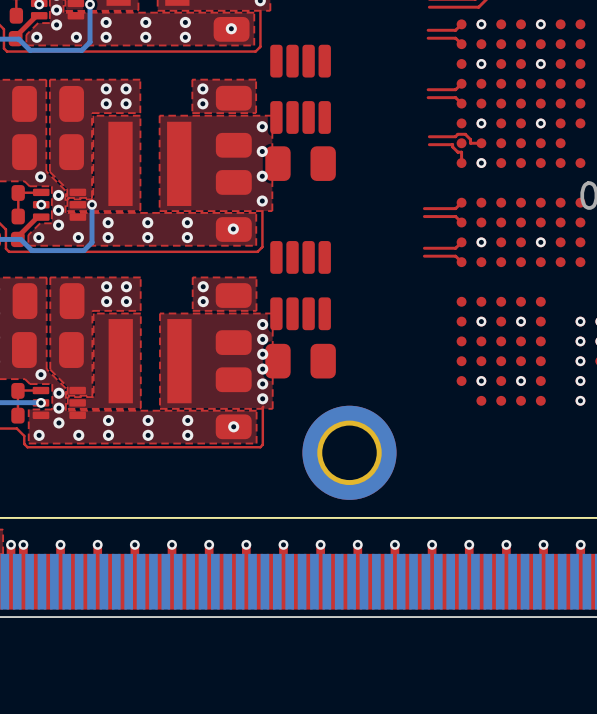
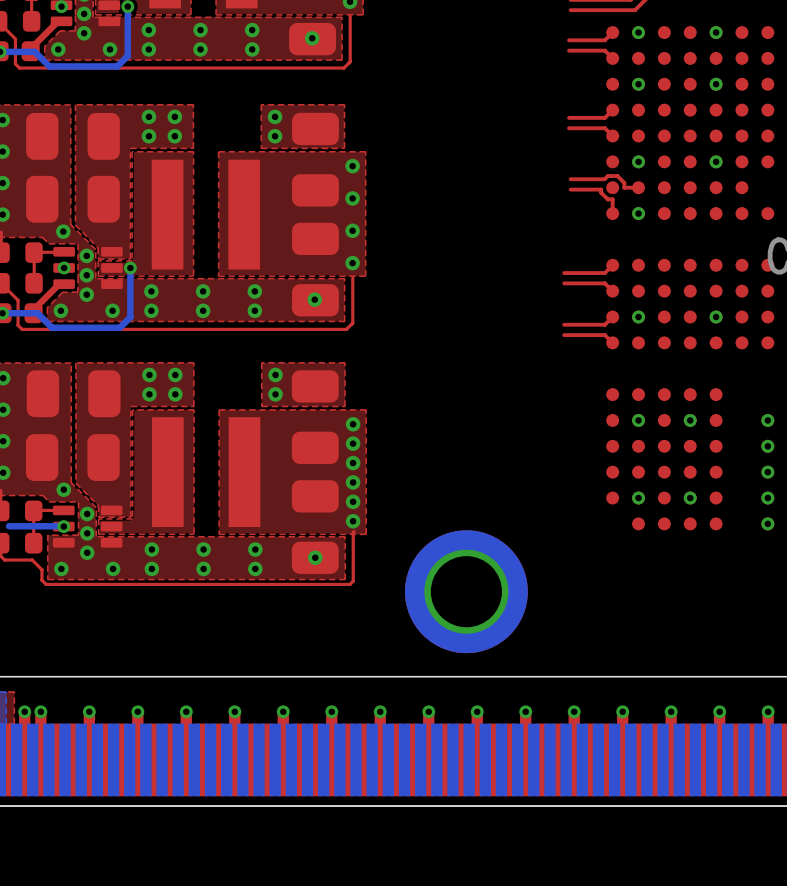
part: (300, 89) -> none
part: (300, 163) -> none
part: (300, 285) -> none
part: (300, 361) -> none

